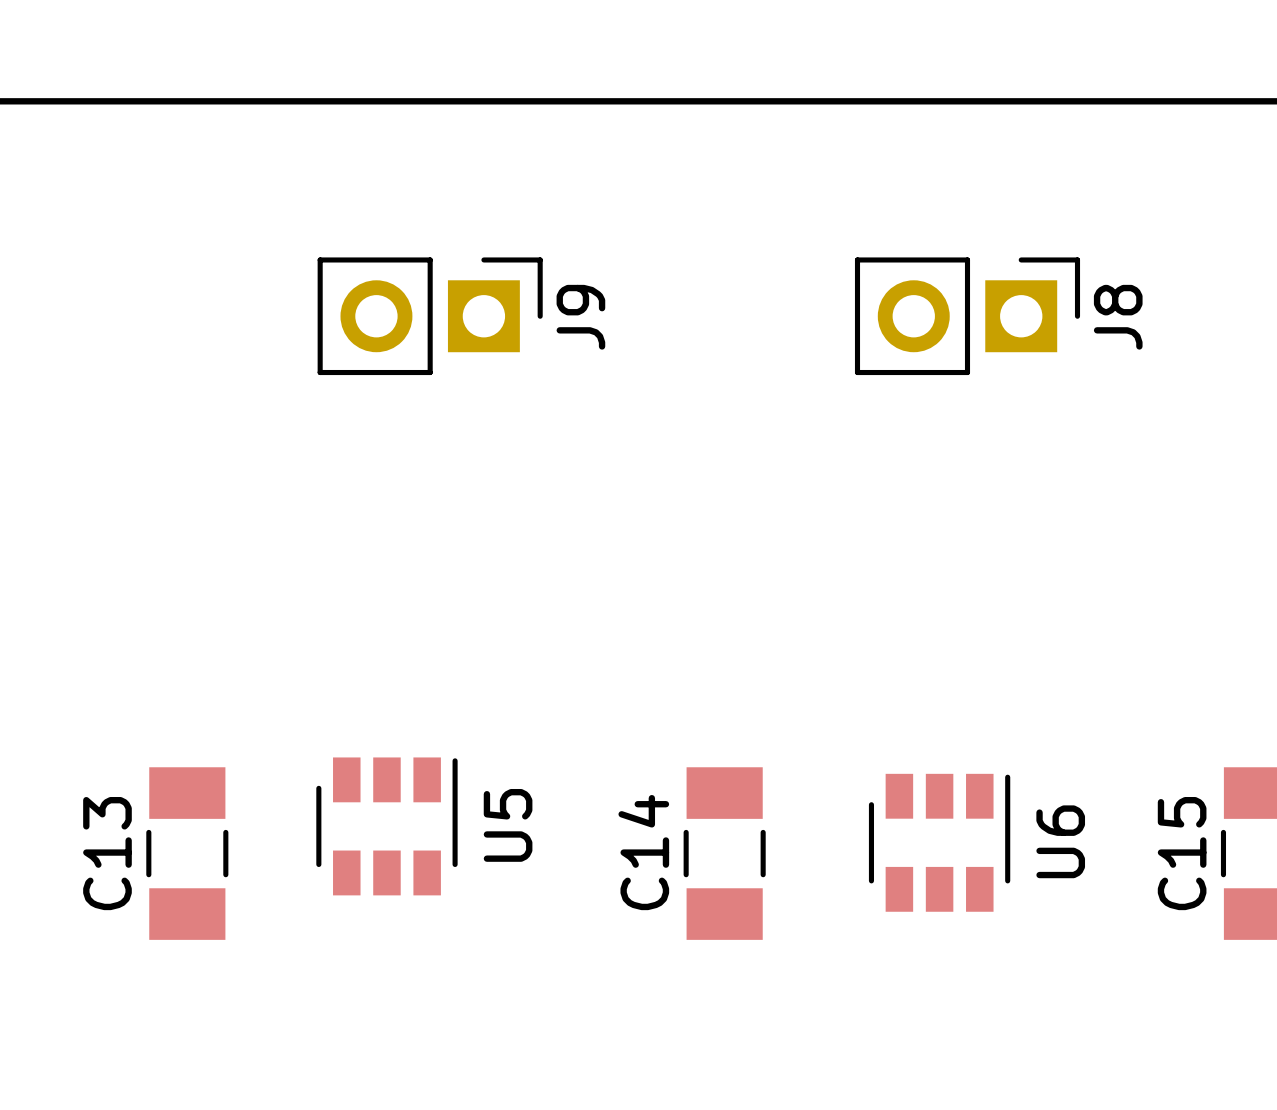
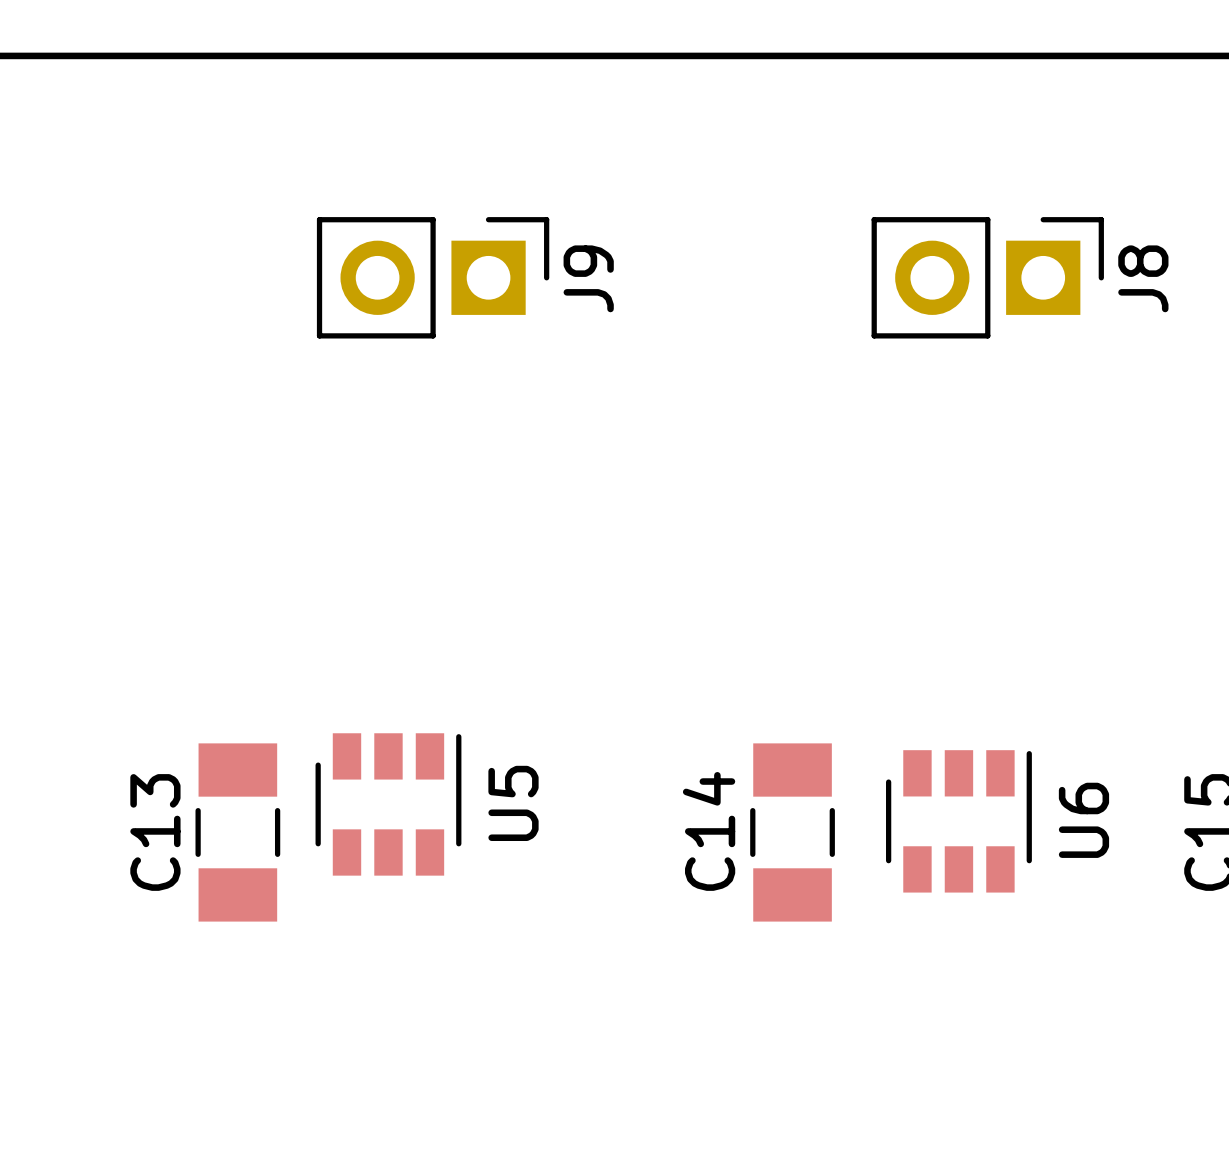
C13 position: (187, 853) -> (237, 832)
C14 position: (724, 853) -> (792, 832)

